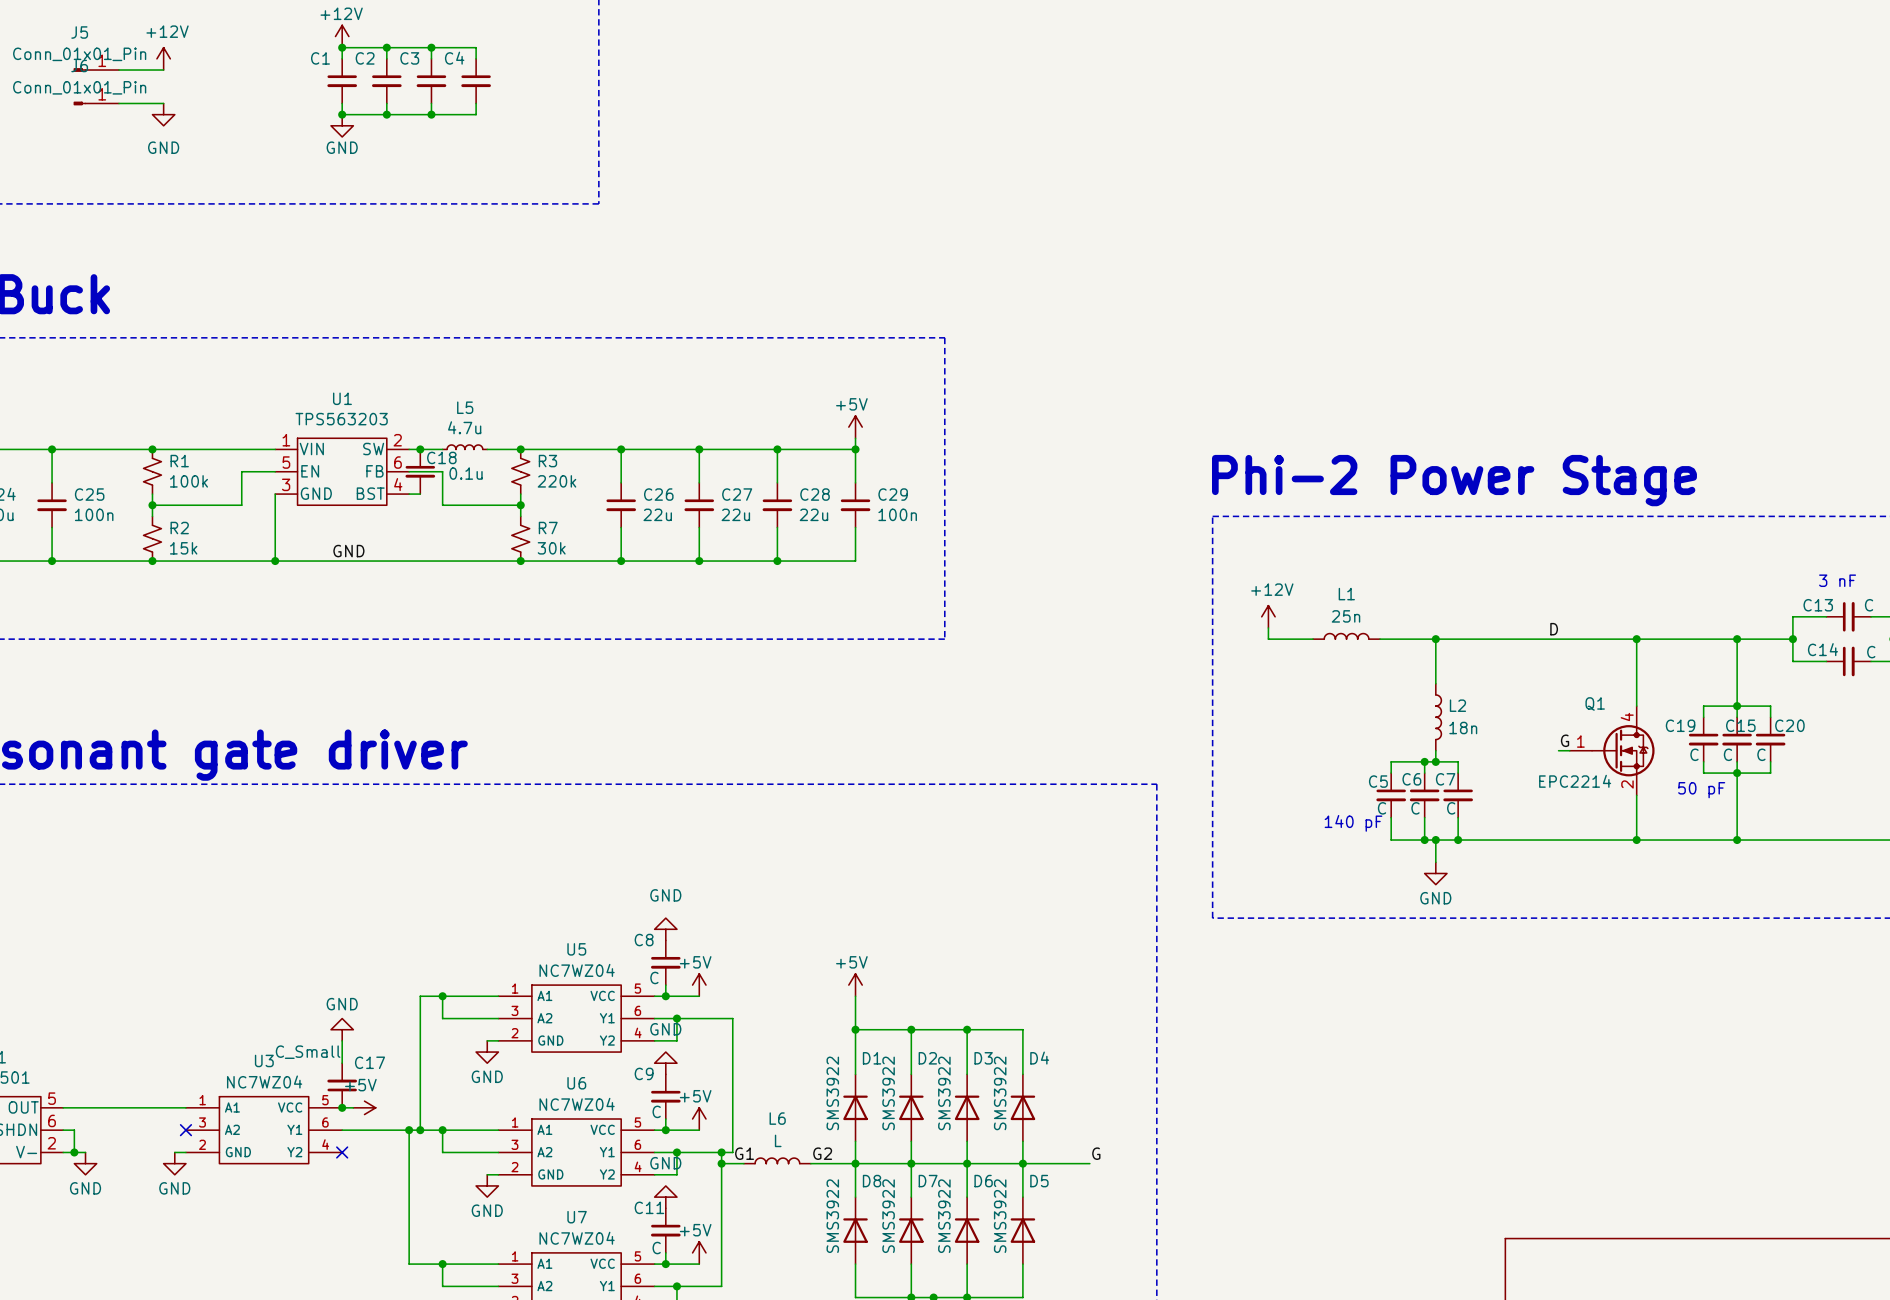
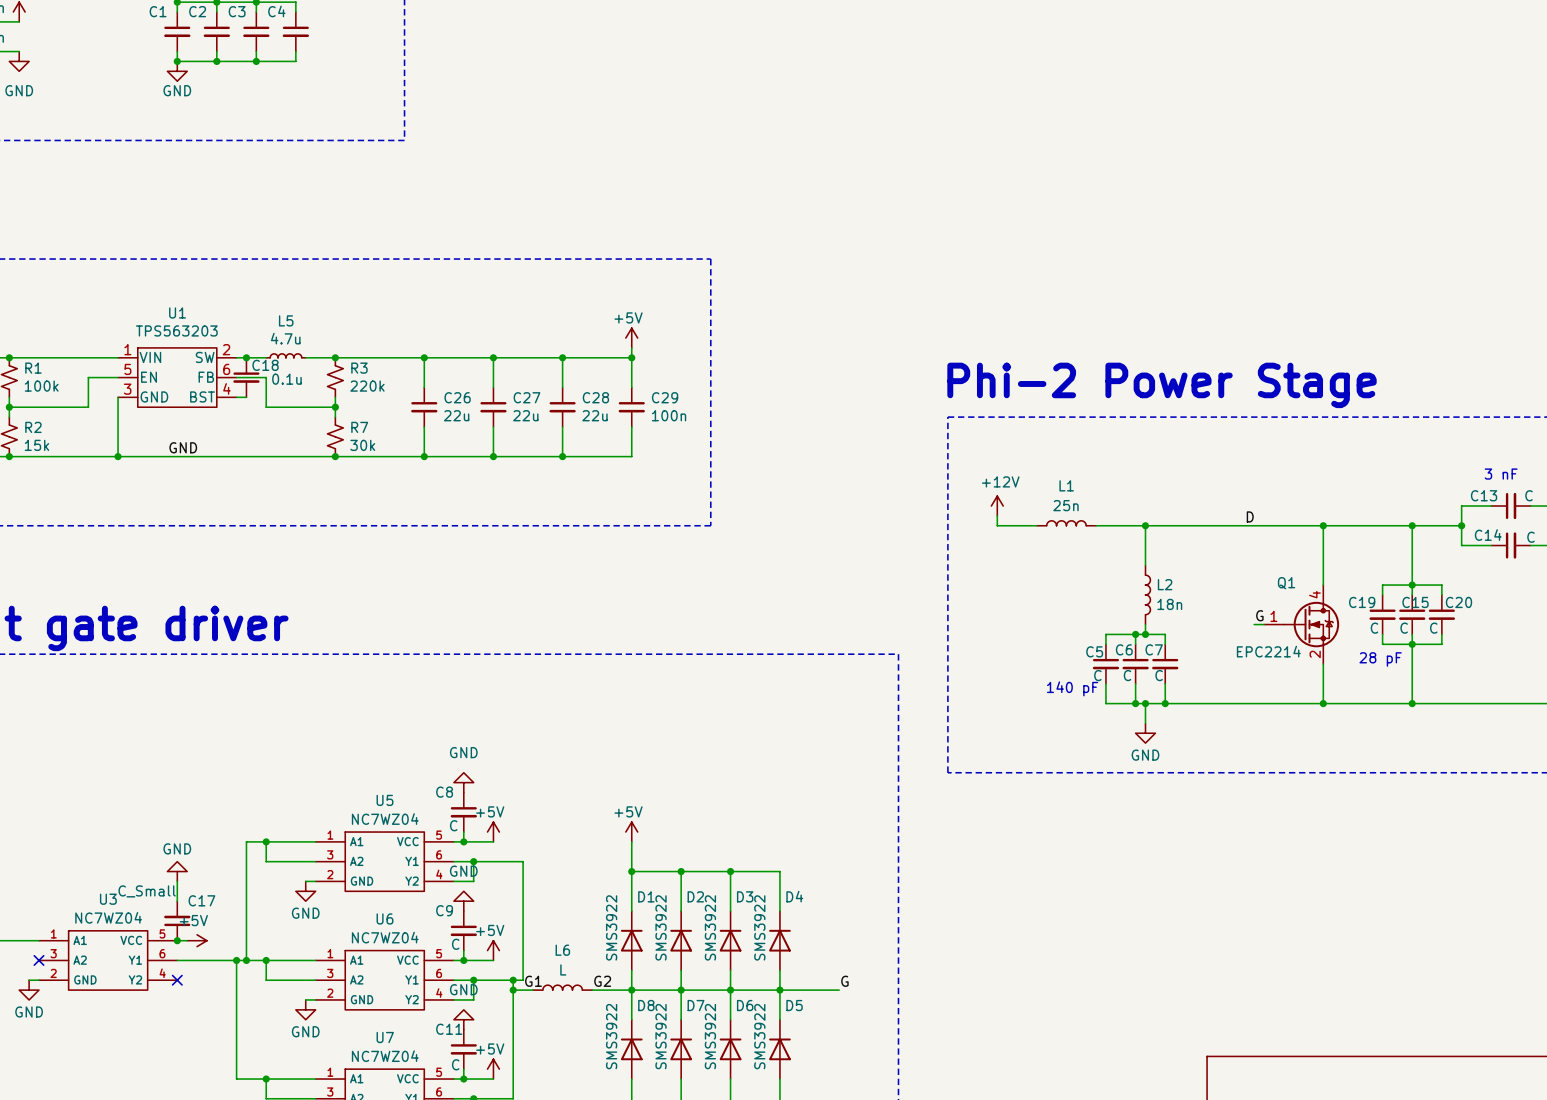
text: 50 pF (1701, 790) -> 28 pF (1380, 659)

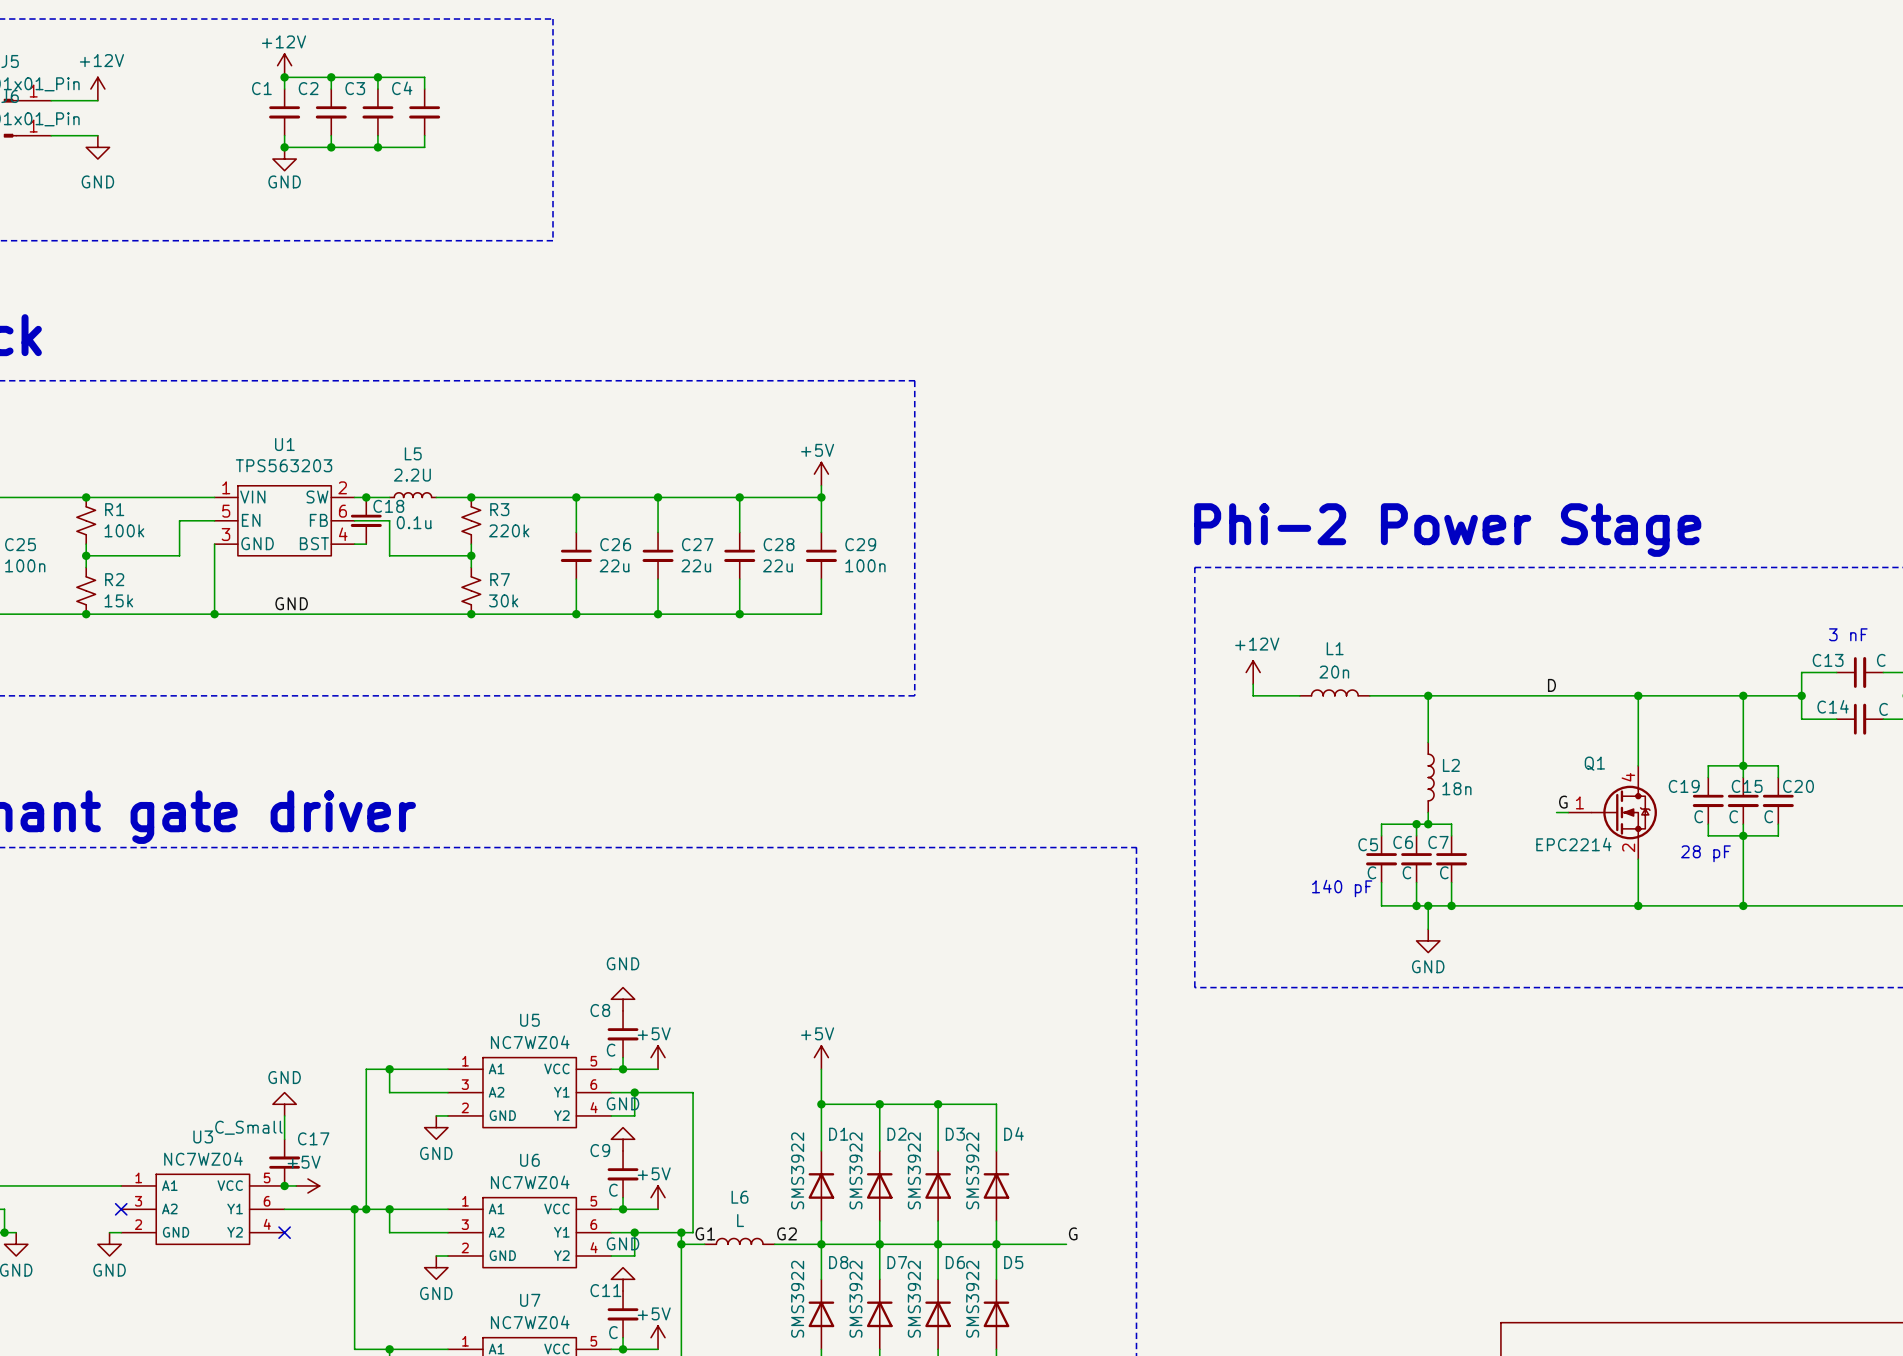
L5 value: 4.7u (285, 338) -> 2.2U (412, 475)
L1 value: 25n (1065, 505) -> 20n (1334, 672)

